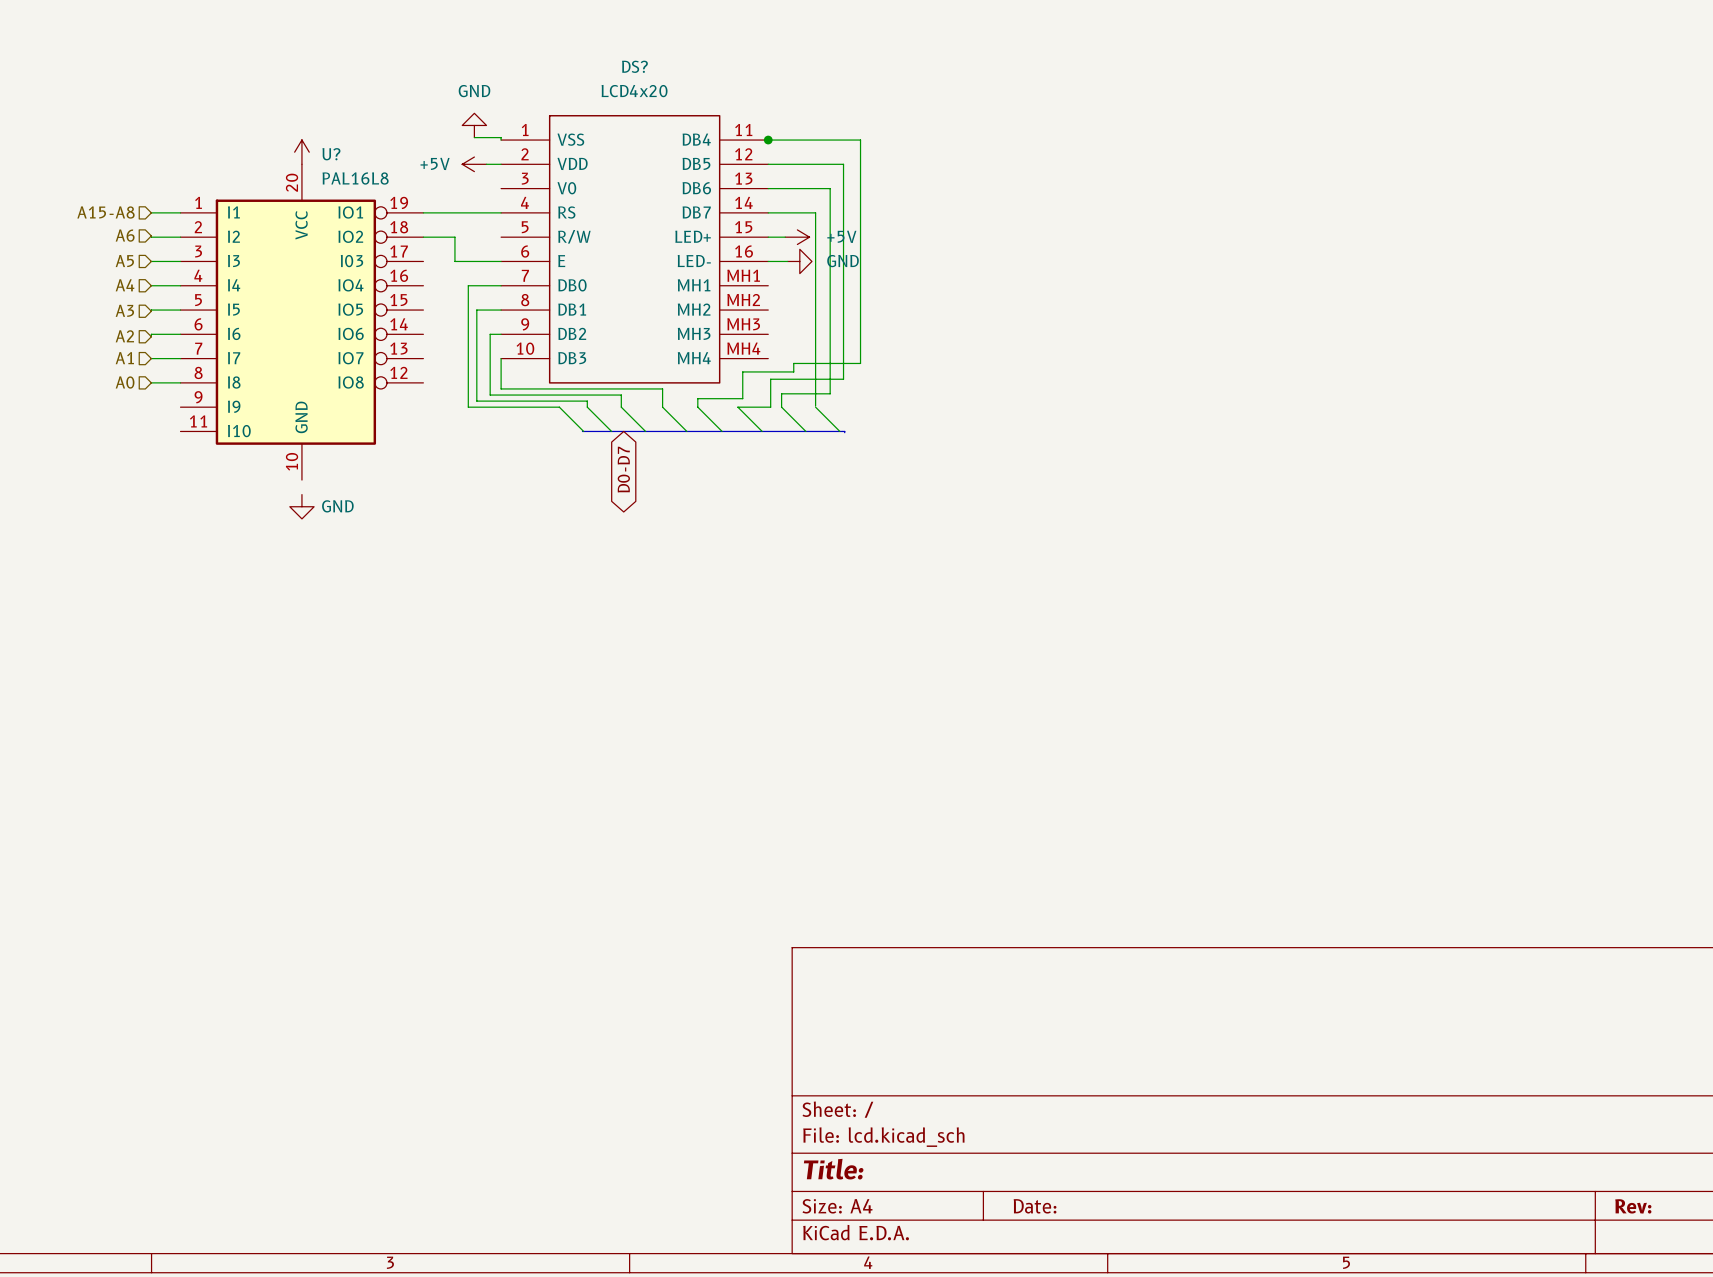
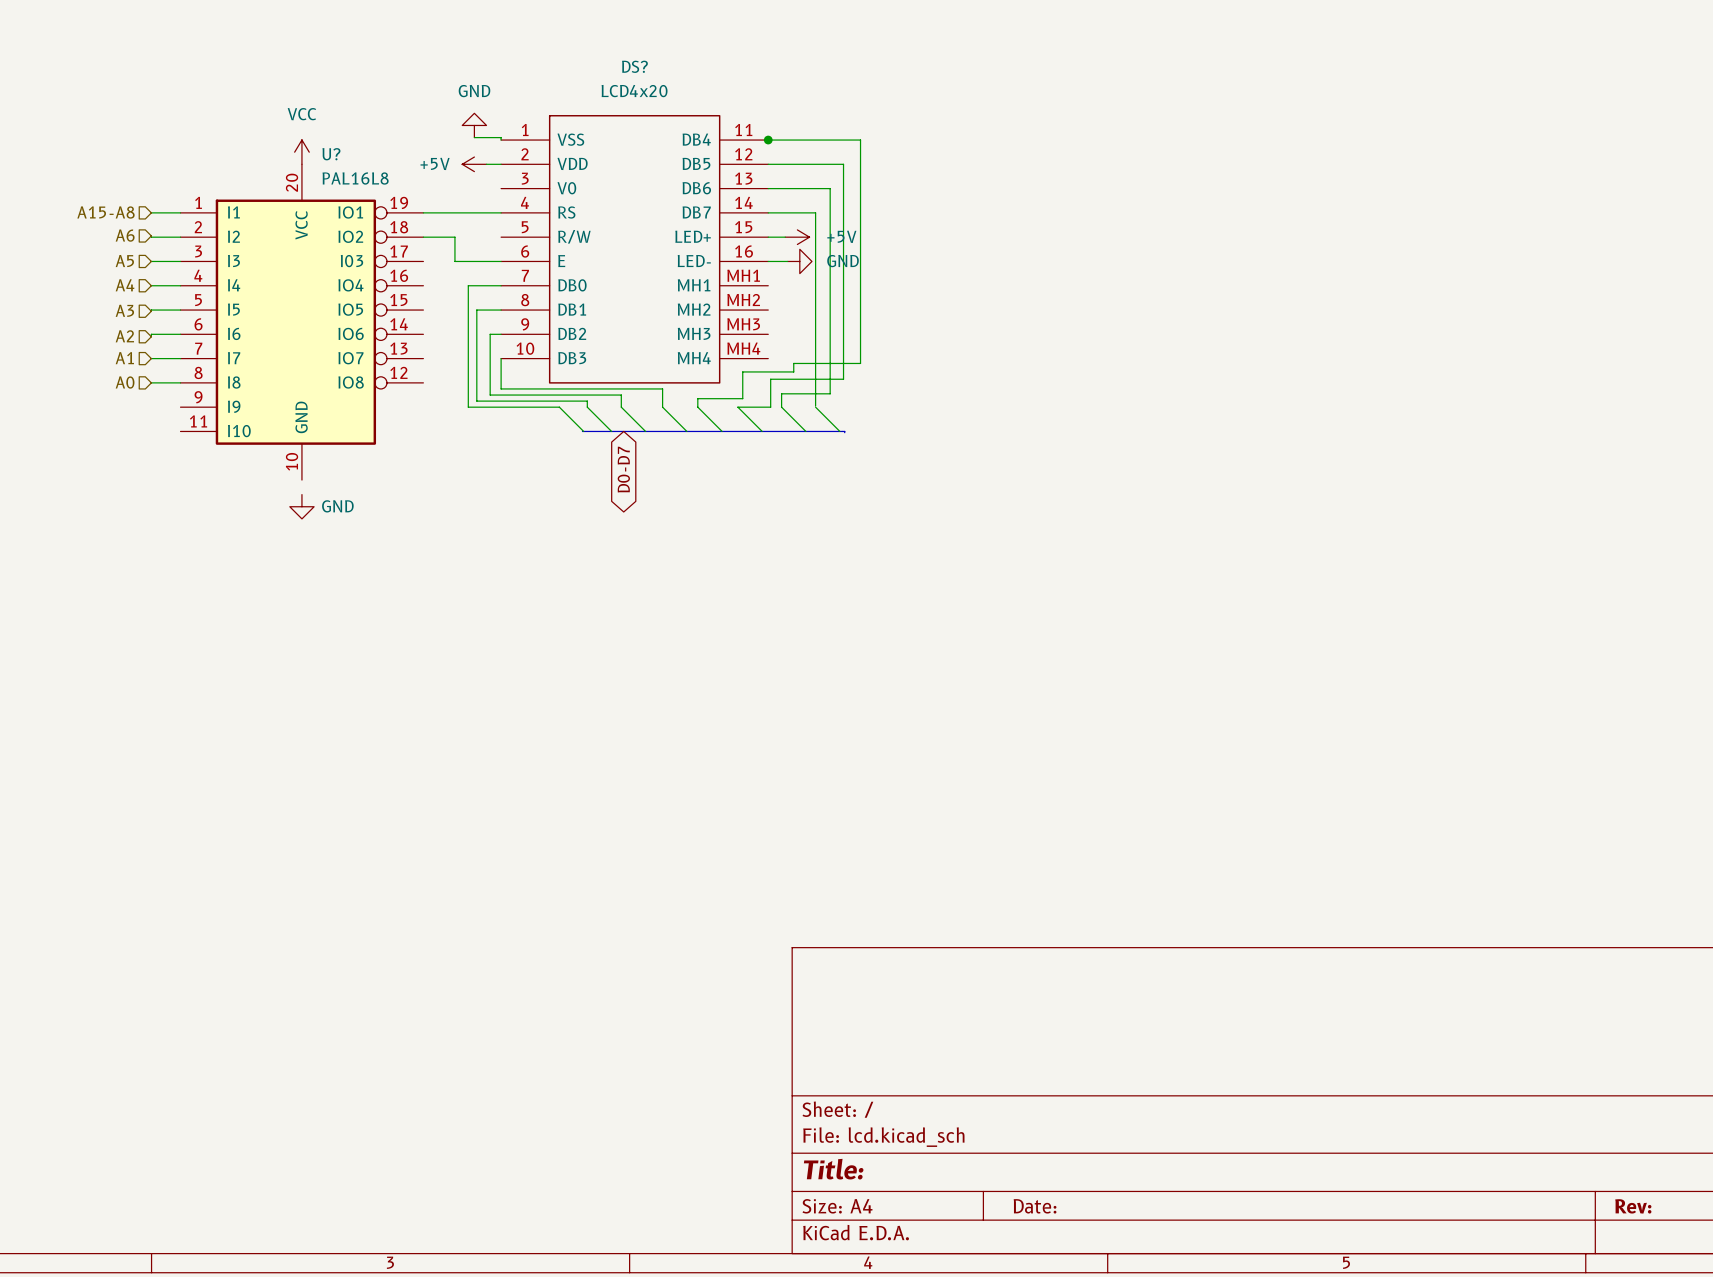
power symbol text: none -> VCC (301, 114)

